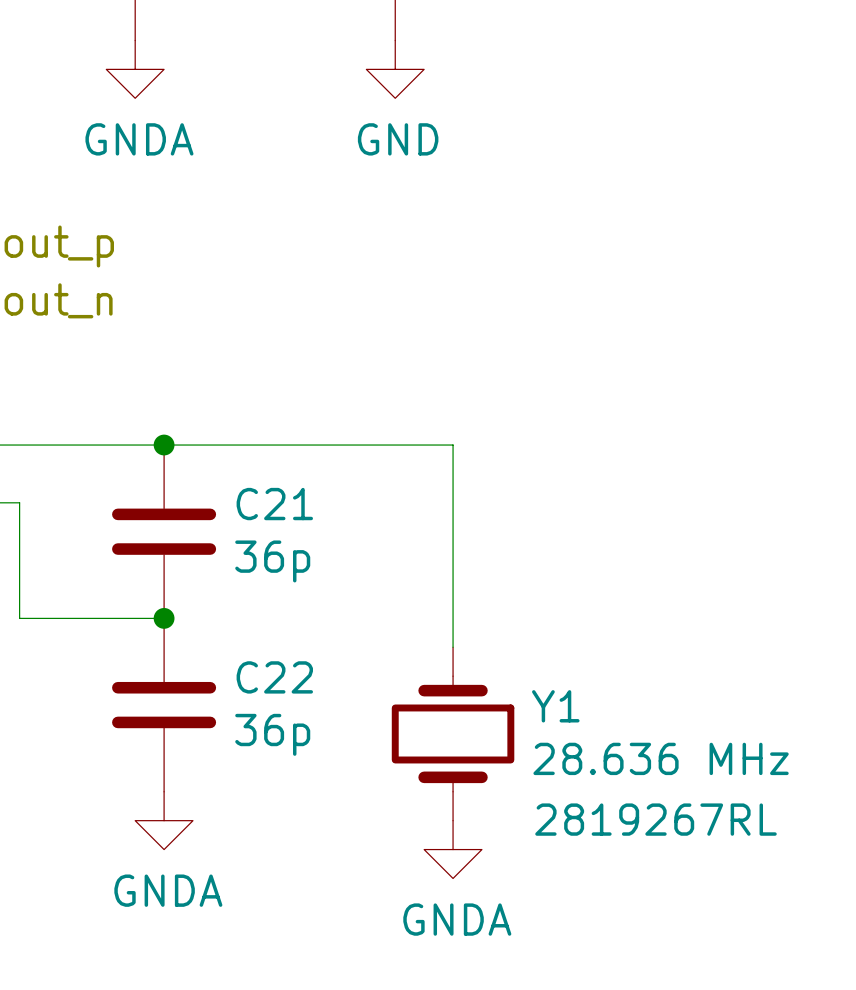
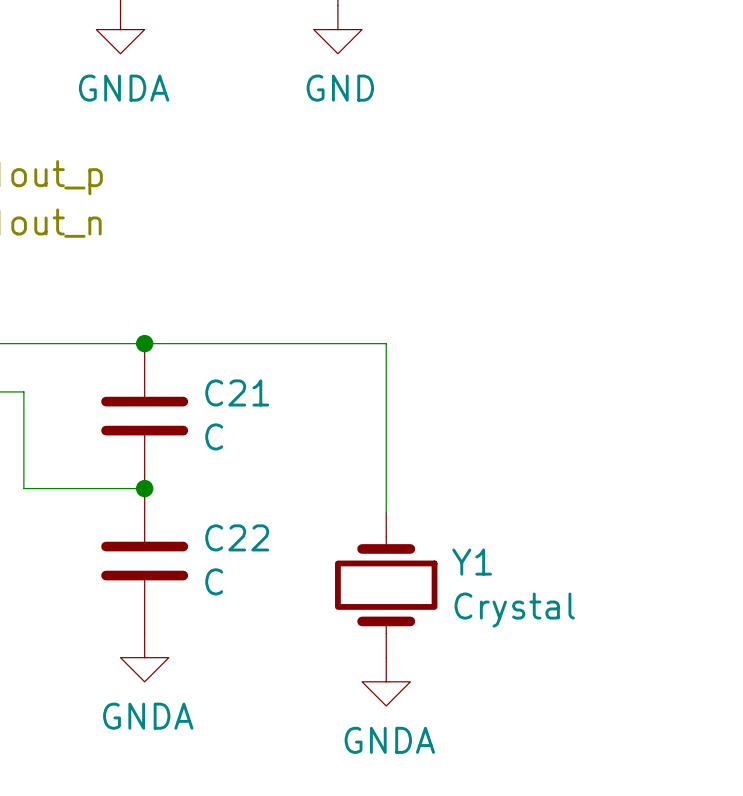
C21 value: 36p (272, 561) -> C (214, 436)
C22 value: 36p (272, 734) -> C (214, 581)
Y1 value: 28.636 MHz (661, 758) -> Crystal (514, 610)
Y1 text: 2819267RL (656, 819) -> none

